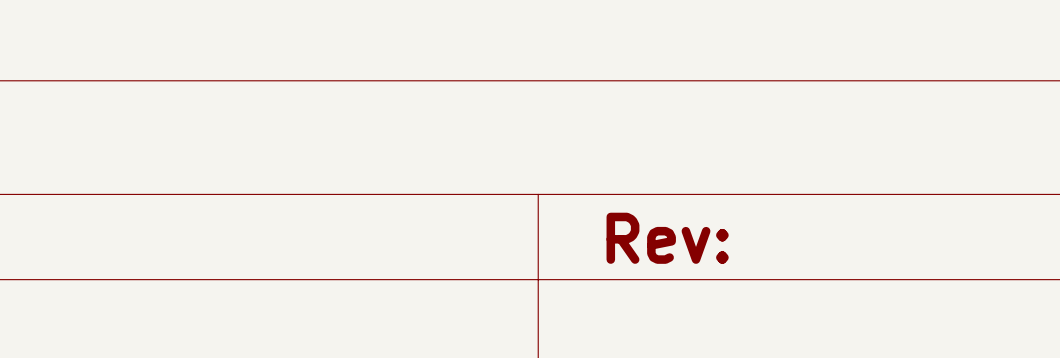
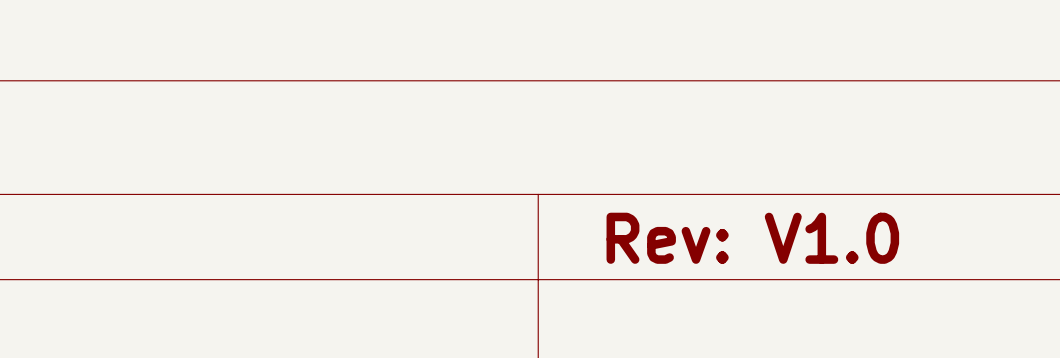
title block: Rev: (667, 238) -> Rev: V1.0 (752, 238)

